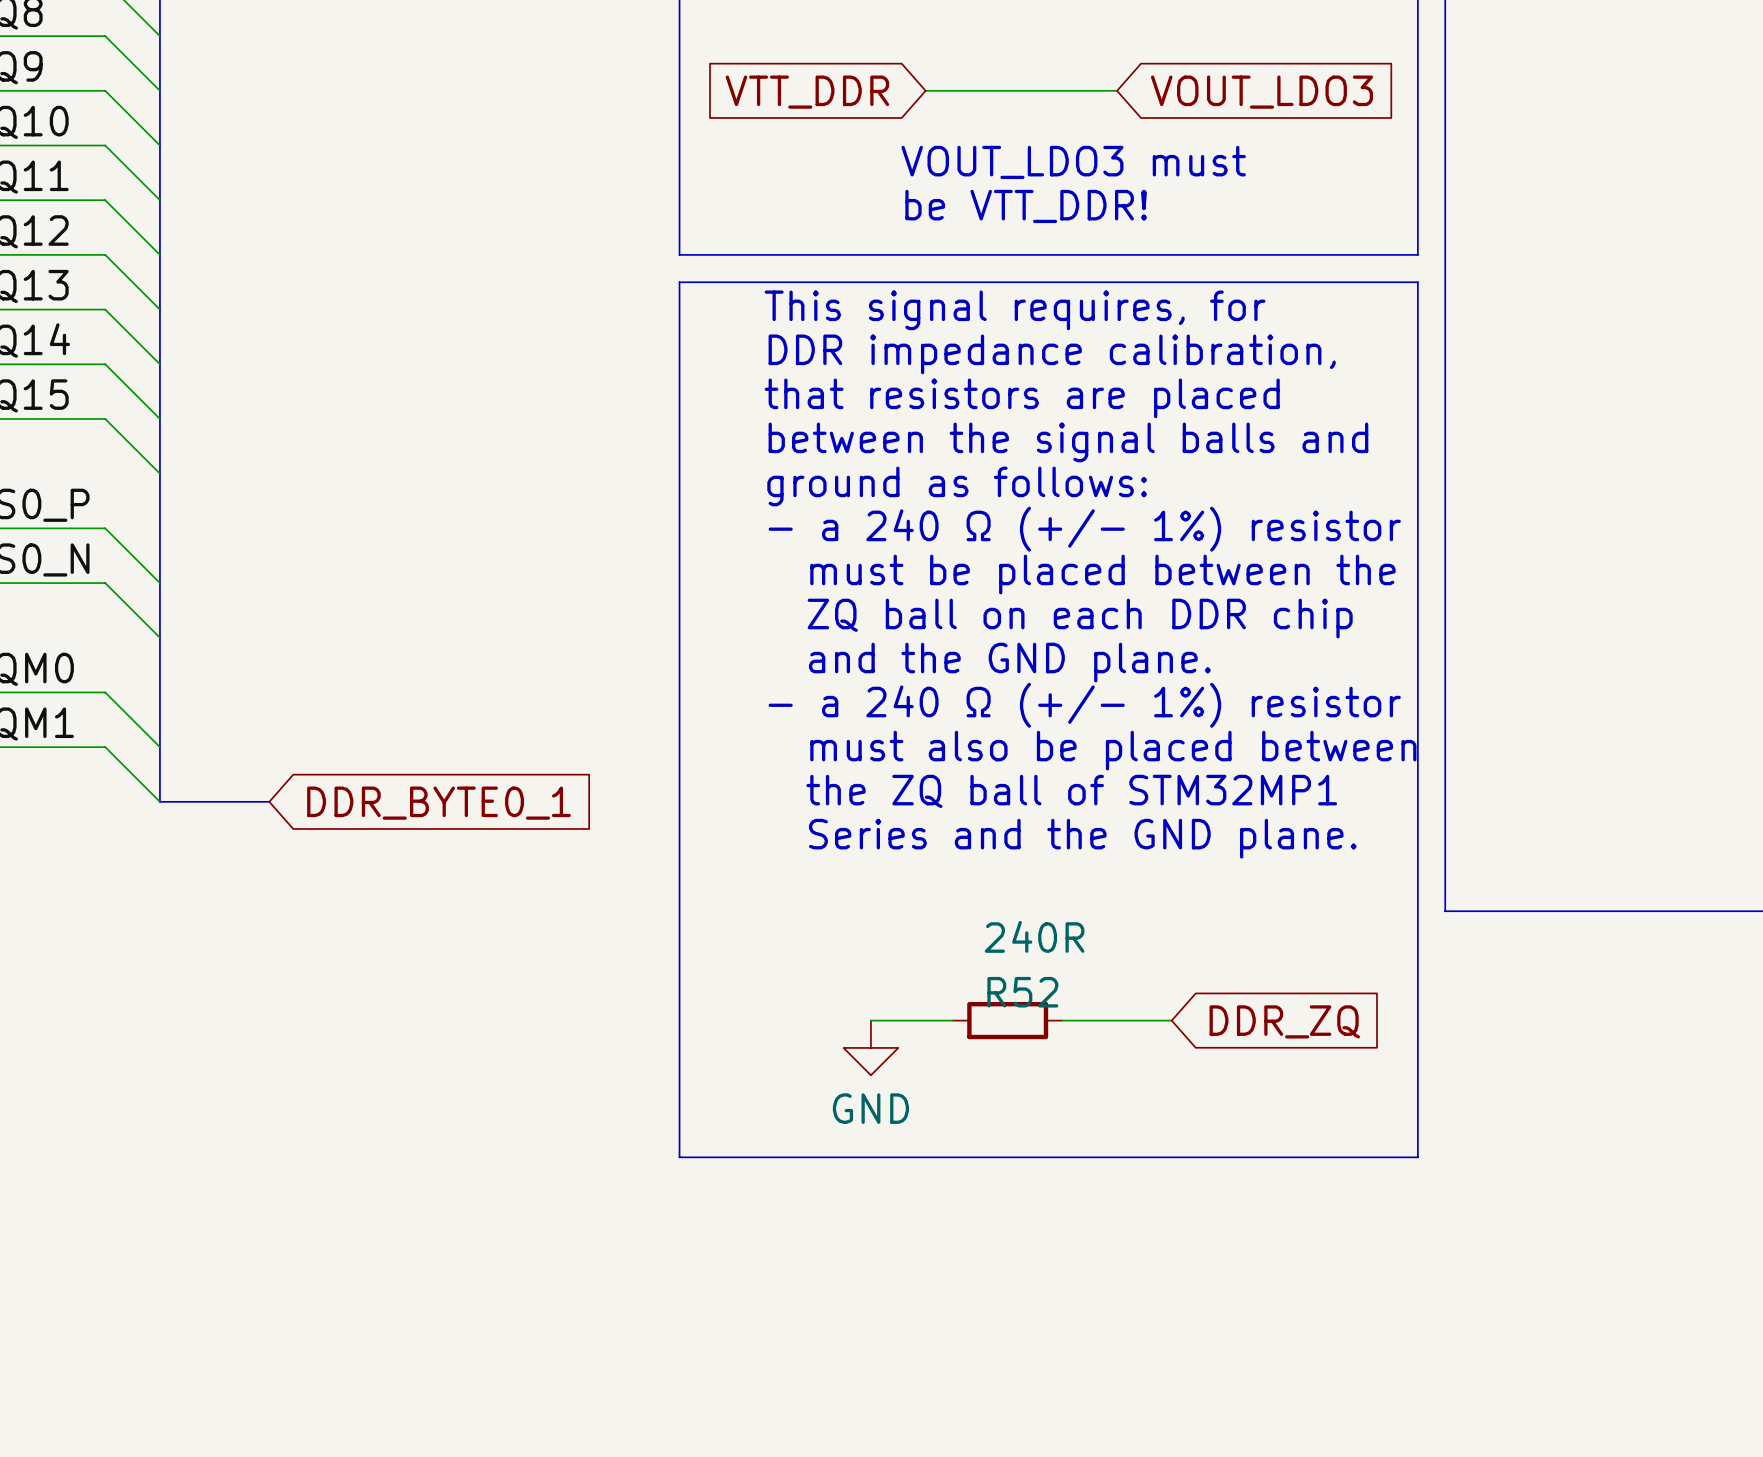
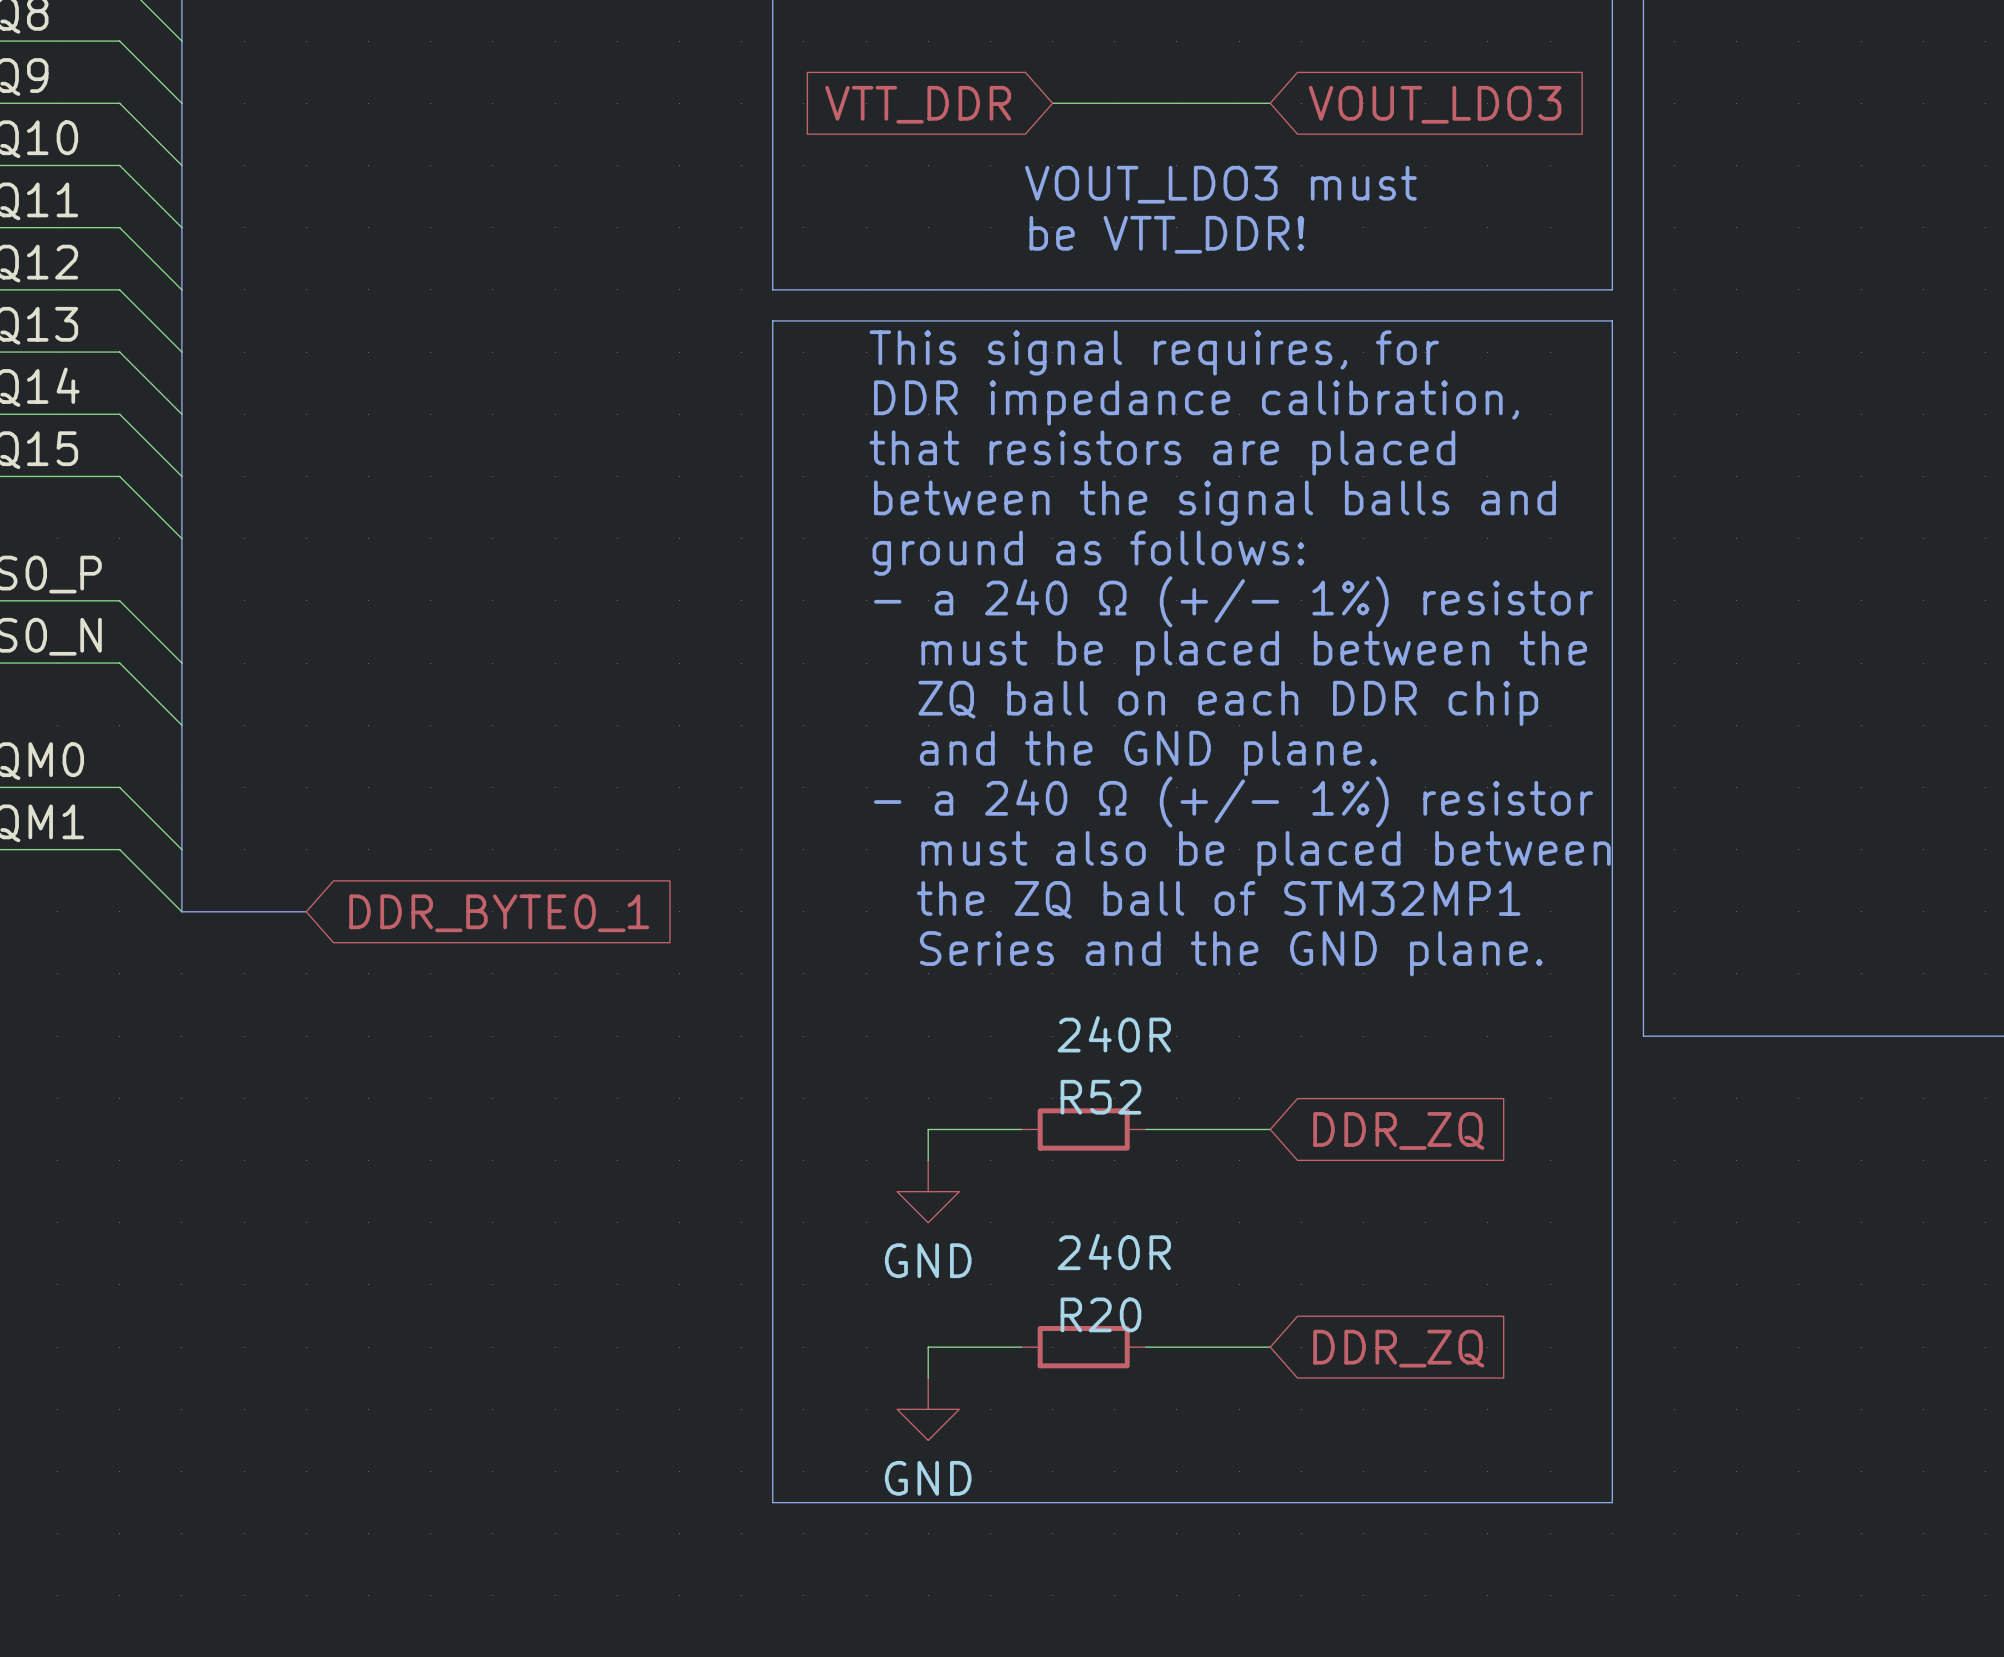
wire: none -> (1021, 1129) (928, 1129) (928, 1160)
wire: (870, 1020) (952, 1020) -> none
R52 position: (1007, 1020) -> (1083, 1129)
wire: (1062, 1020) (1171, 1020) -> (1145, 1129) (1270, 1129)
global label position: DDR_ZQ (1284, 1021) -> DDR_ZQ (1398, 1130)
power symbol position: GND (870, 1047) -> GND (928, 1191)
line: (679, 1157) (1417, 1157) -> (772, 1316) (772, 1502) (1612, 1502) (1612, 1316)
wire: none -> (1021, 1347) (928, 1347) (928, 1378)
R20: none -> 240R (1083, 1347)
wire: none -> (1145, 1347) (1270, 1347)
global label: none -> DDR_ZQ (1398, 1348)
power symbol: none -> GND (928, 1409)

